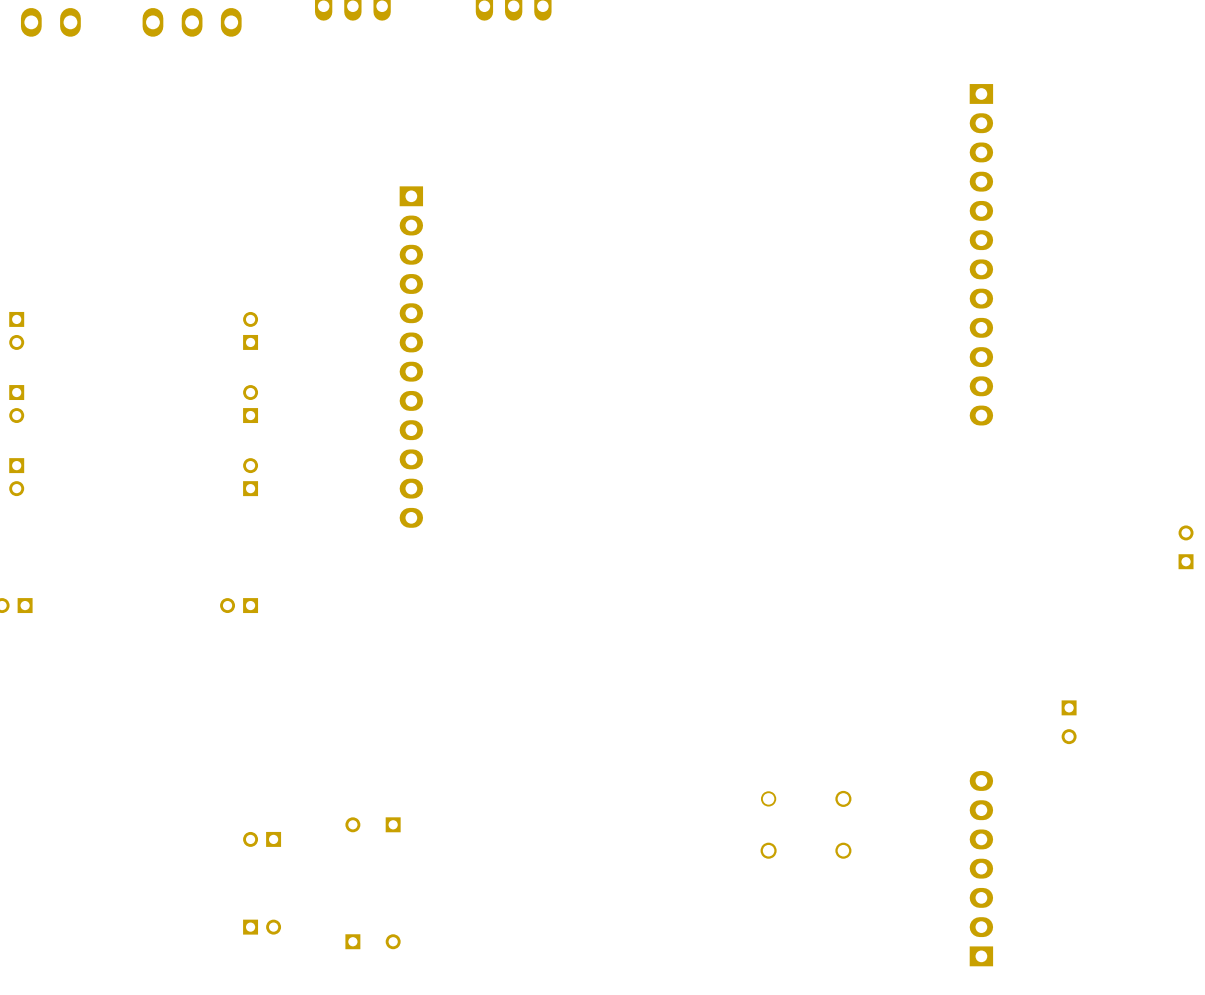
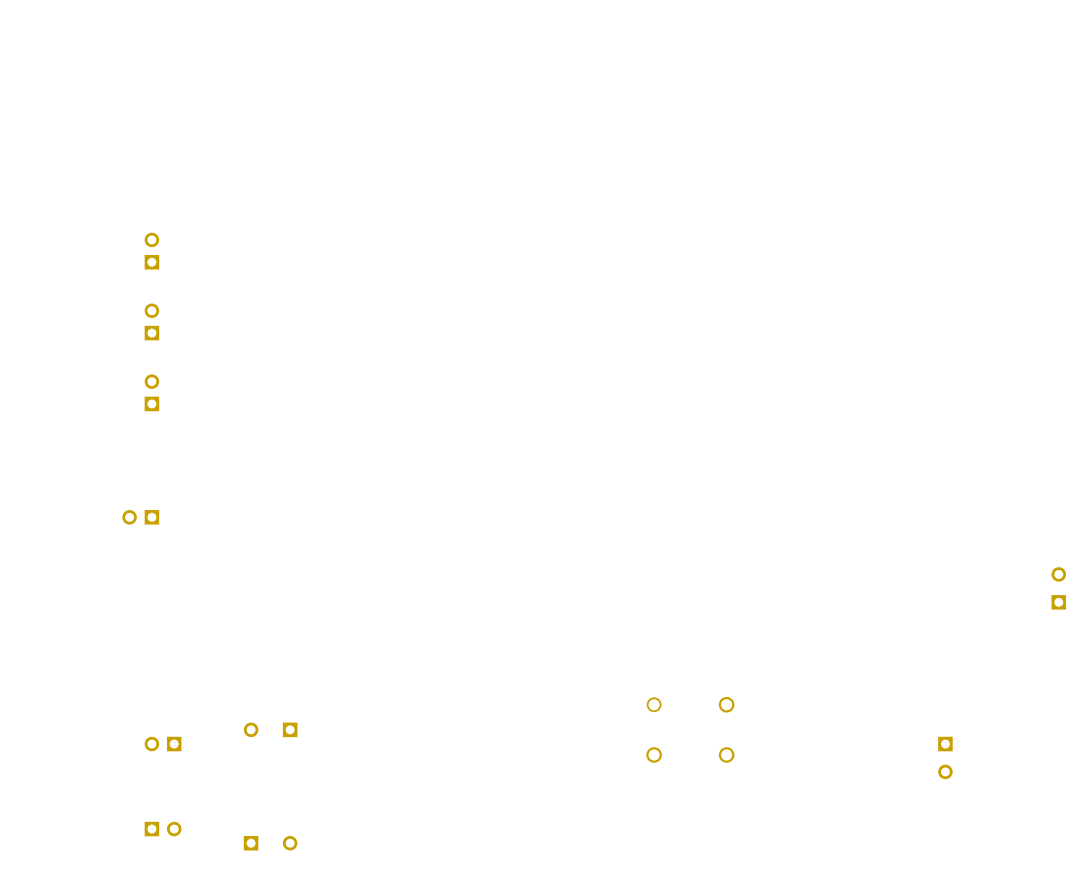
part: (981, 254) -> none
part: (411, 357) -> none
part: (1186, 547) -> none
part: none -> (1058, 588)
part: (1069, 722) -> none
part: none -> (945, 757)
part: (981, 868) -> none

